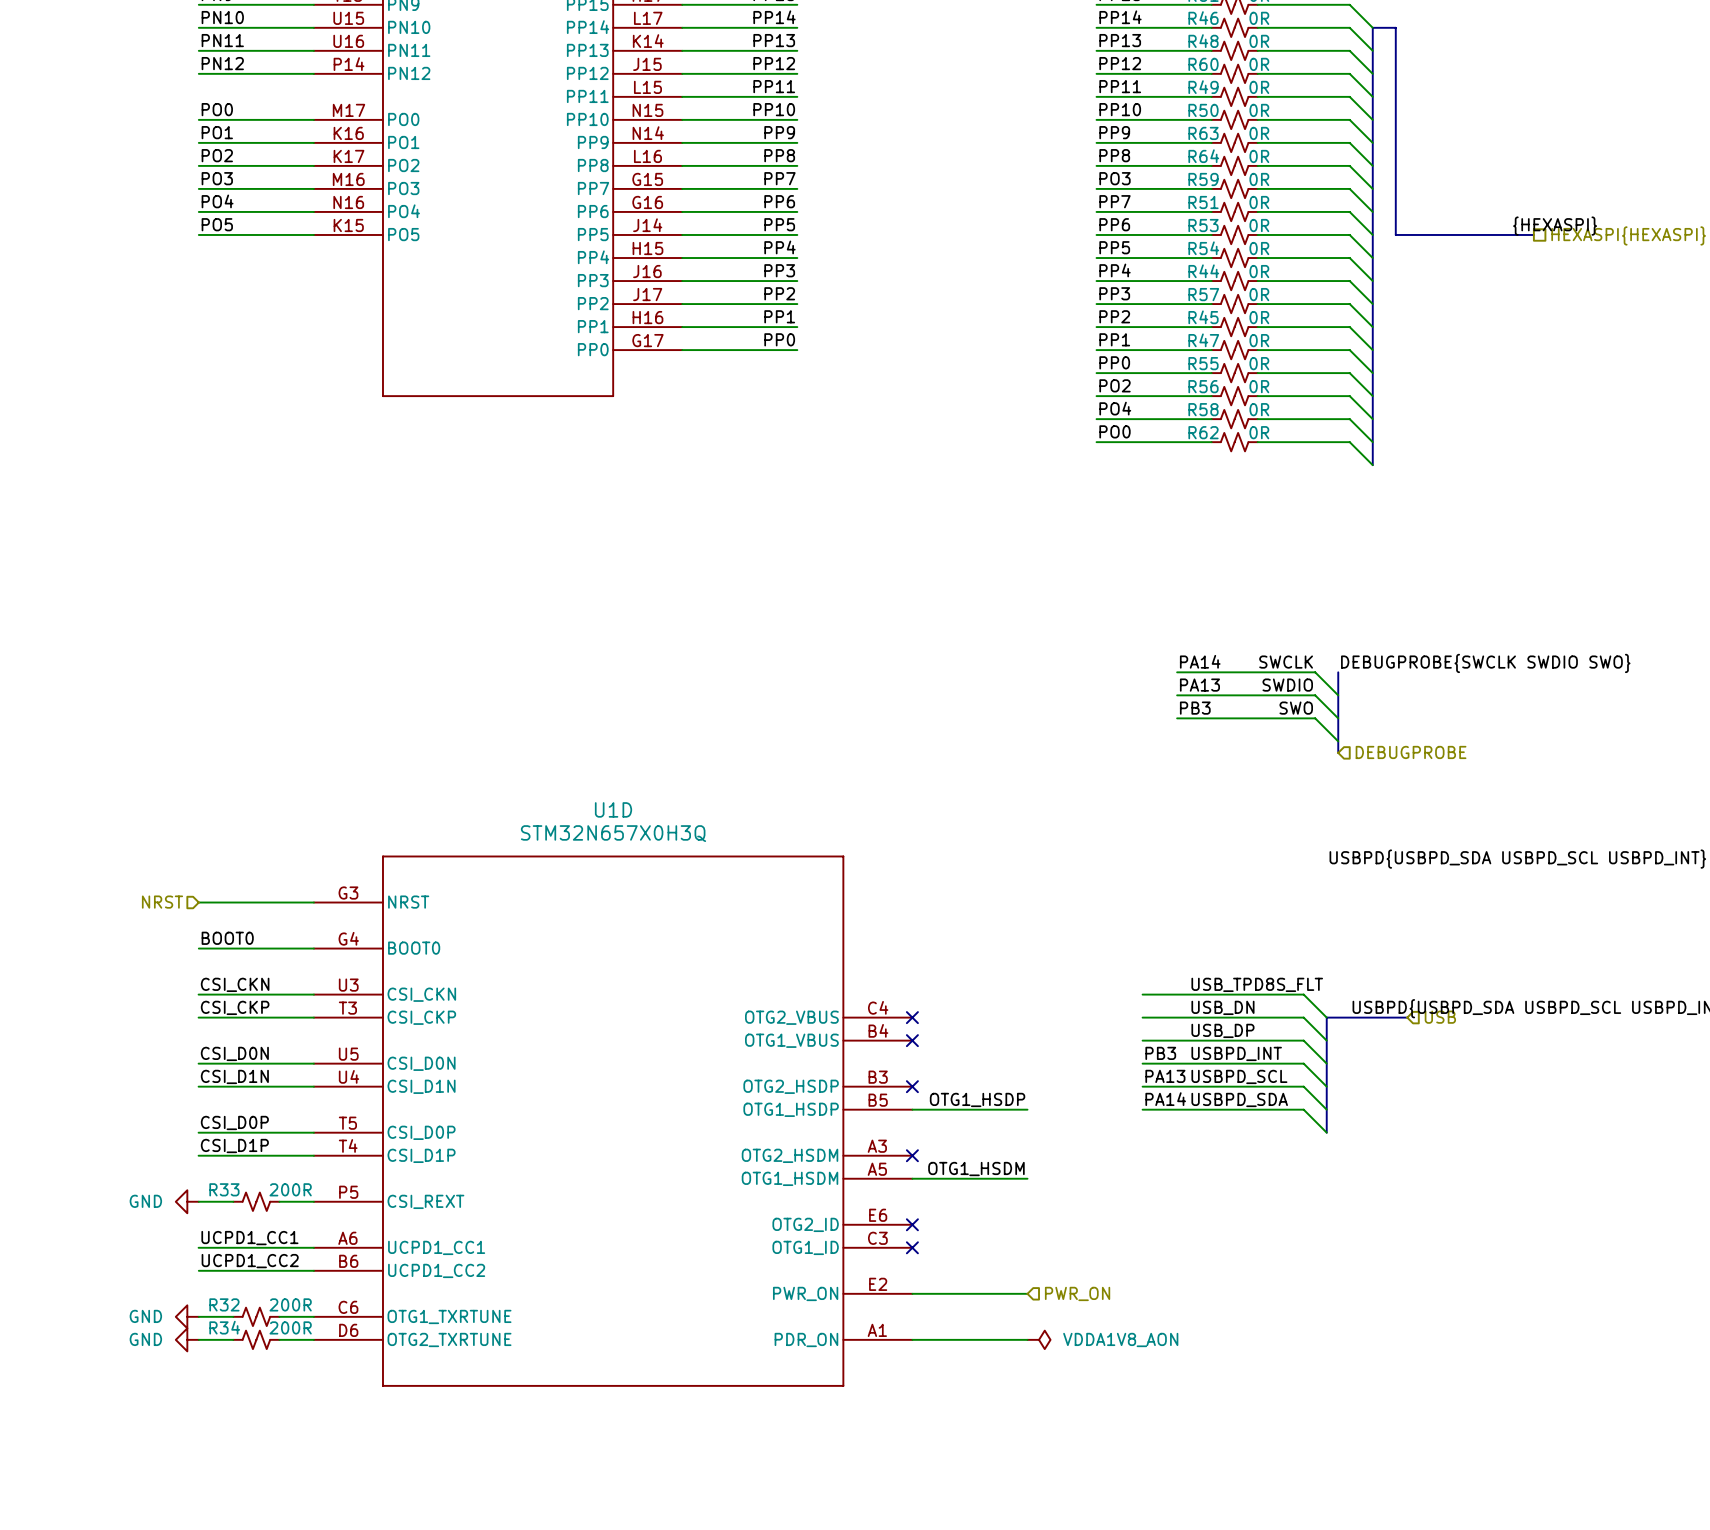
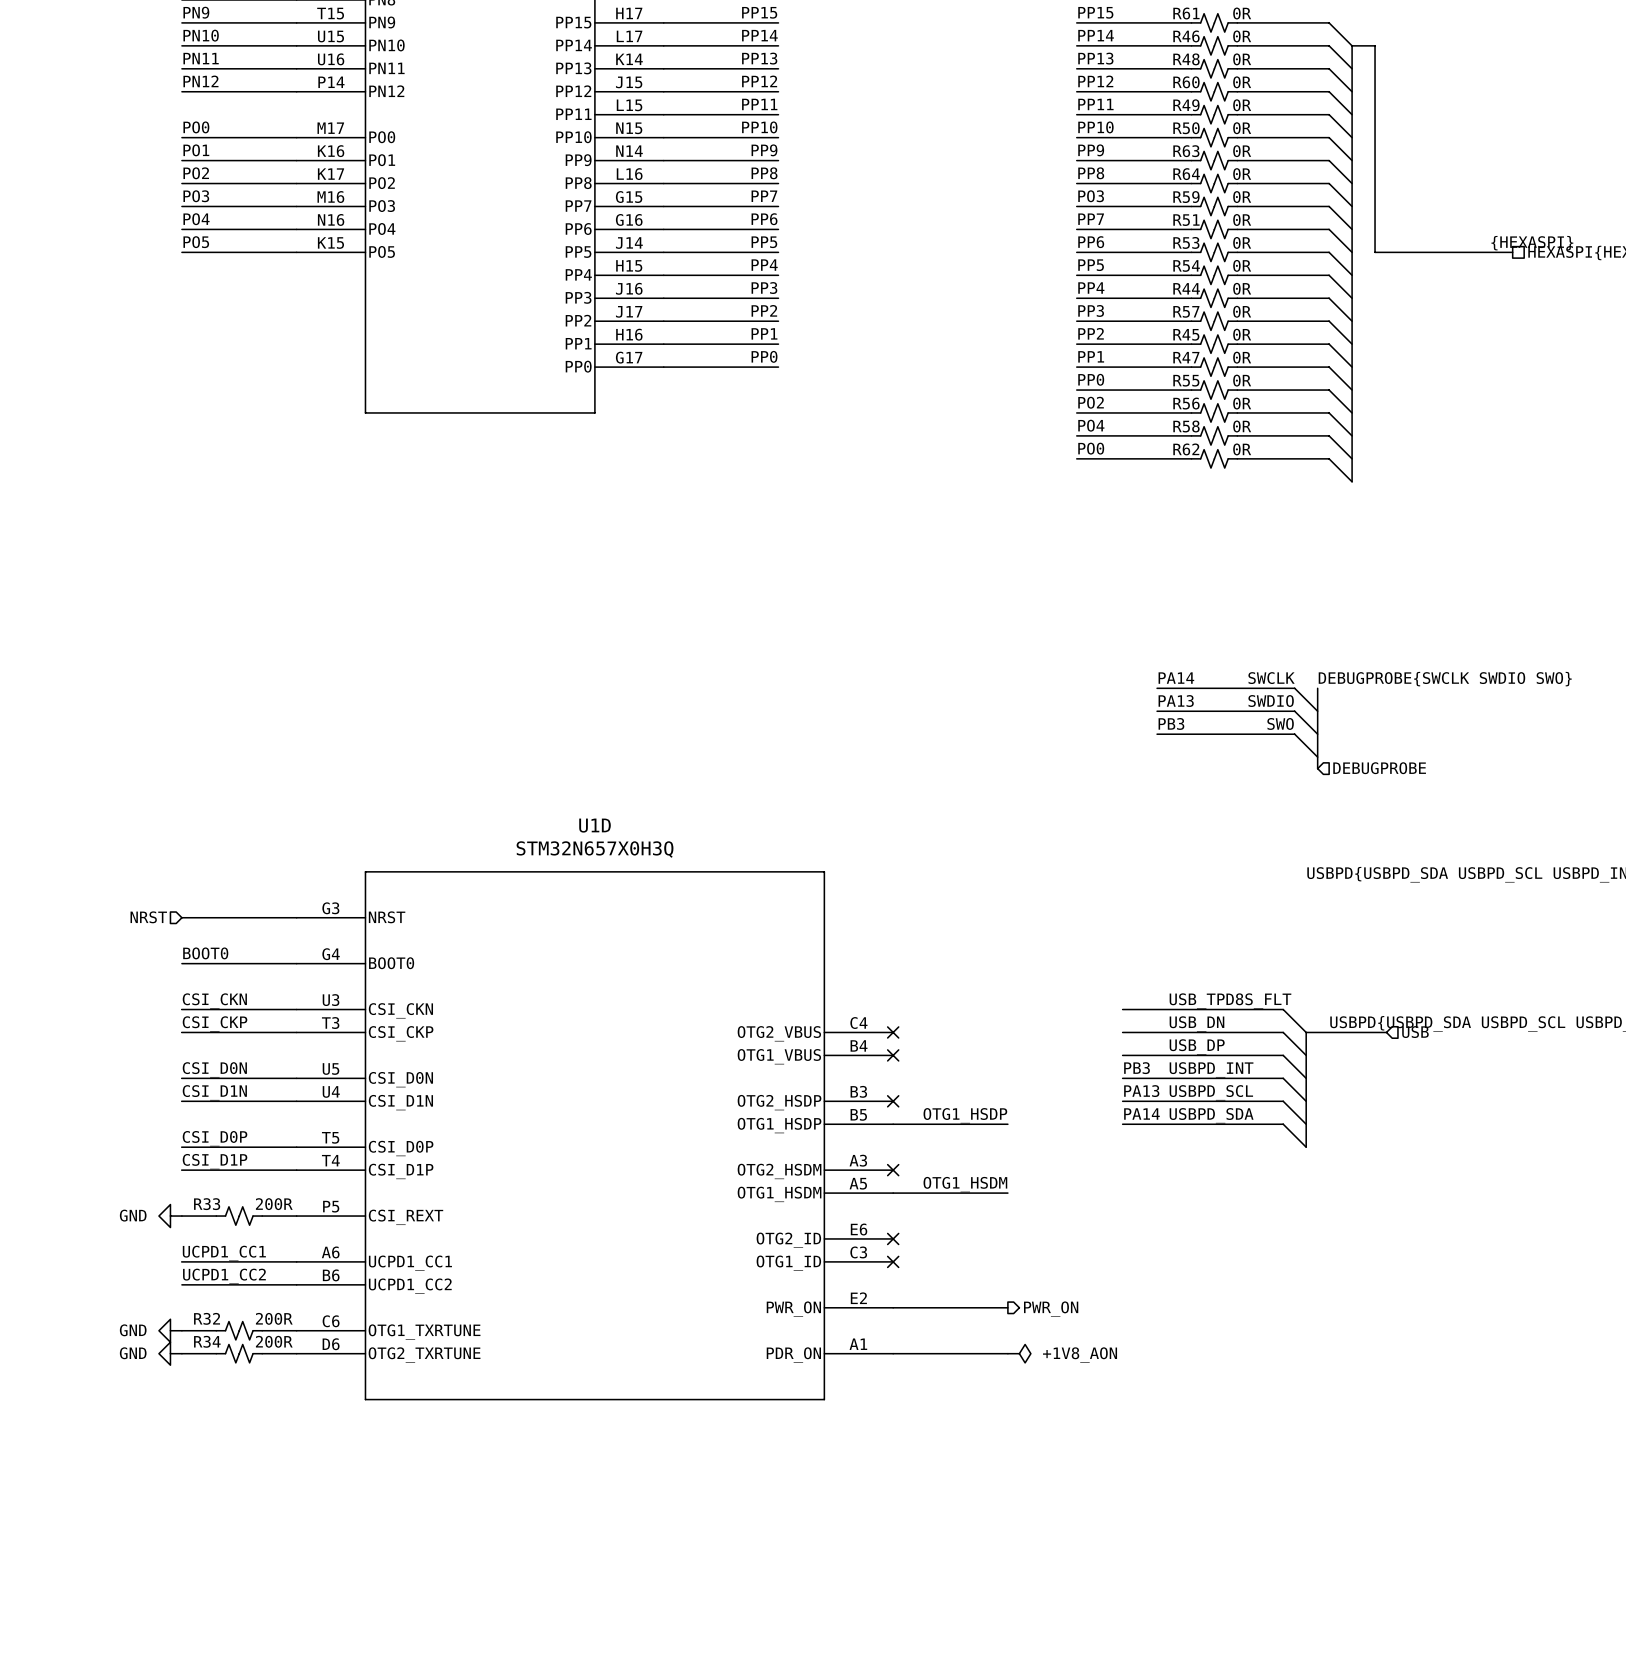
hierarchical label shape: input (1077, 1293) -> output (1051, 1309)
power symbol: VDDA1V8_AON (1039, 1339) -> +1V8_AON (1019, 1353)

